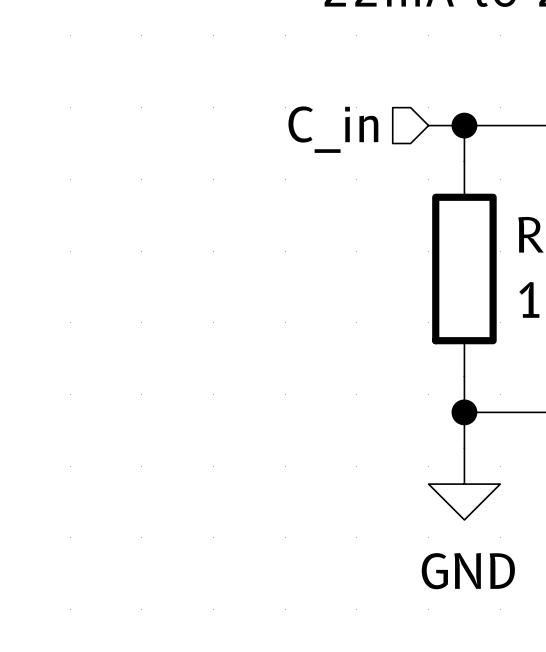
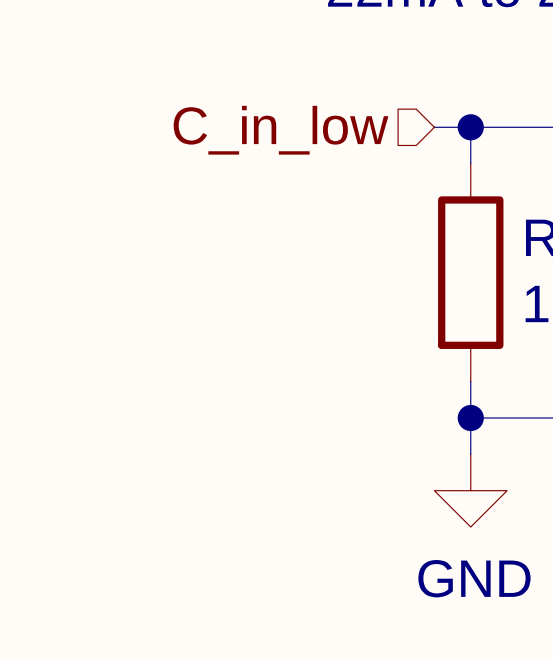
hierarchical label: C_in (333, 129) -> C_in_low (281, 130)

